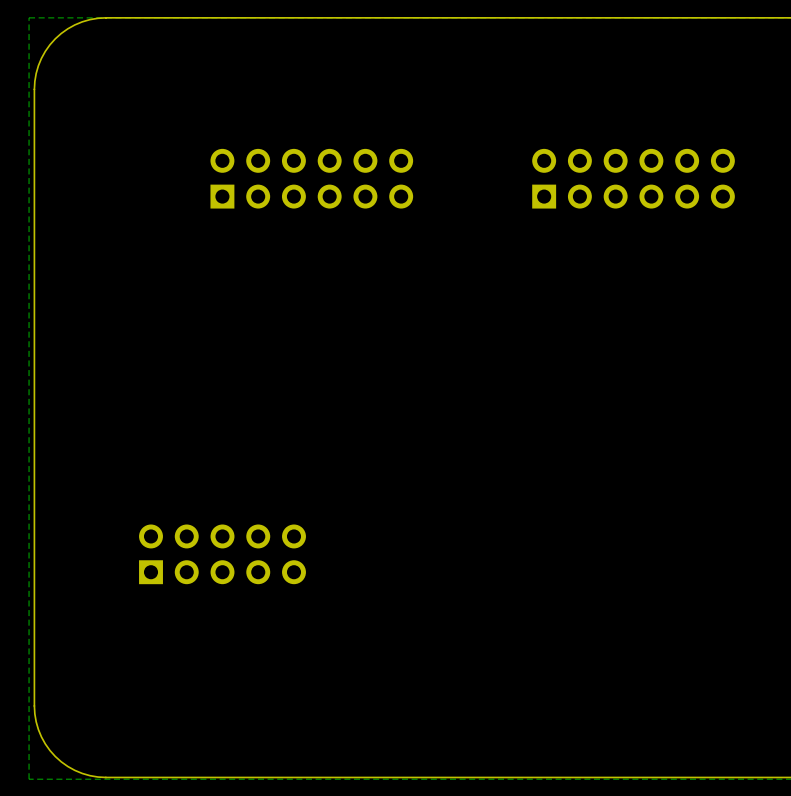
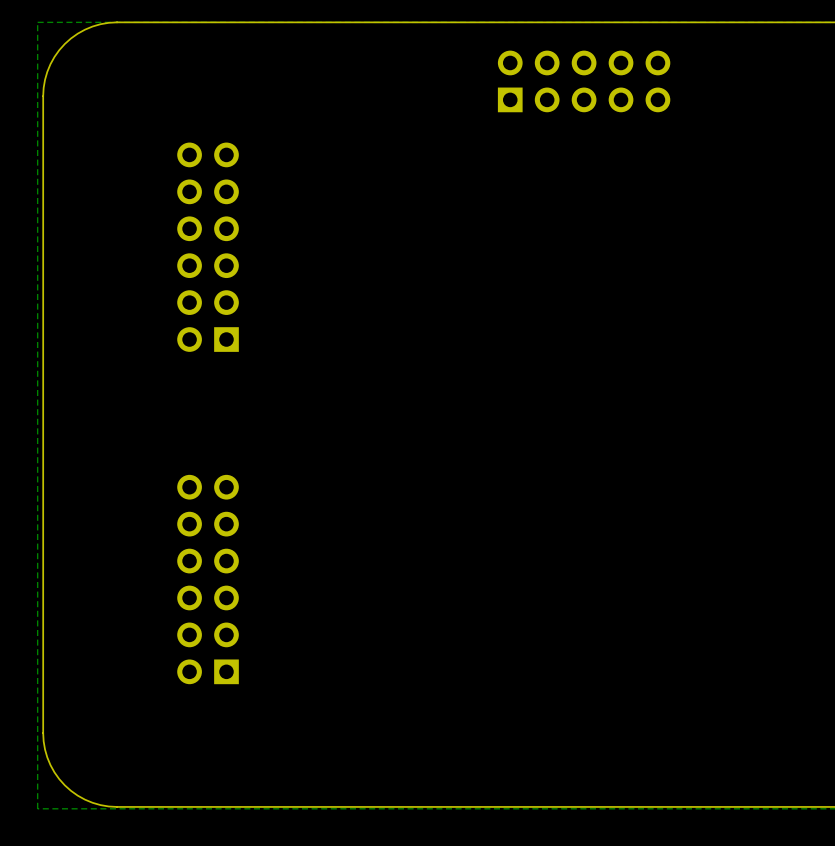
part: none -> (584, 81)
part rotation: 0° (311, 178) -> 90° counterclockwise (208, 247)
part position: (311, 178) -> (208, 247)
part: (633, 178) -> none
part: (222, 554) -> none
part: none -> (208, 579)

